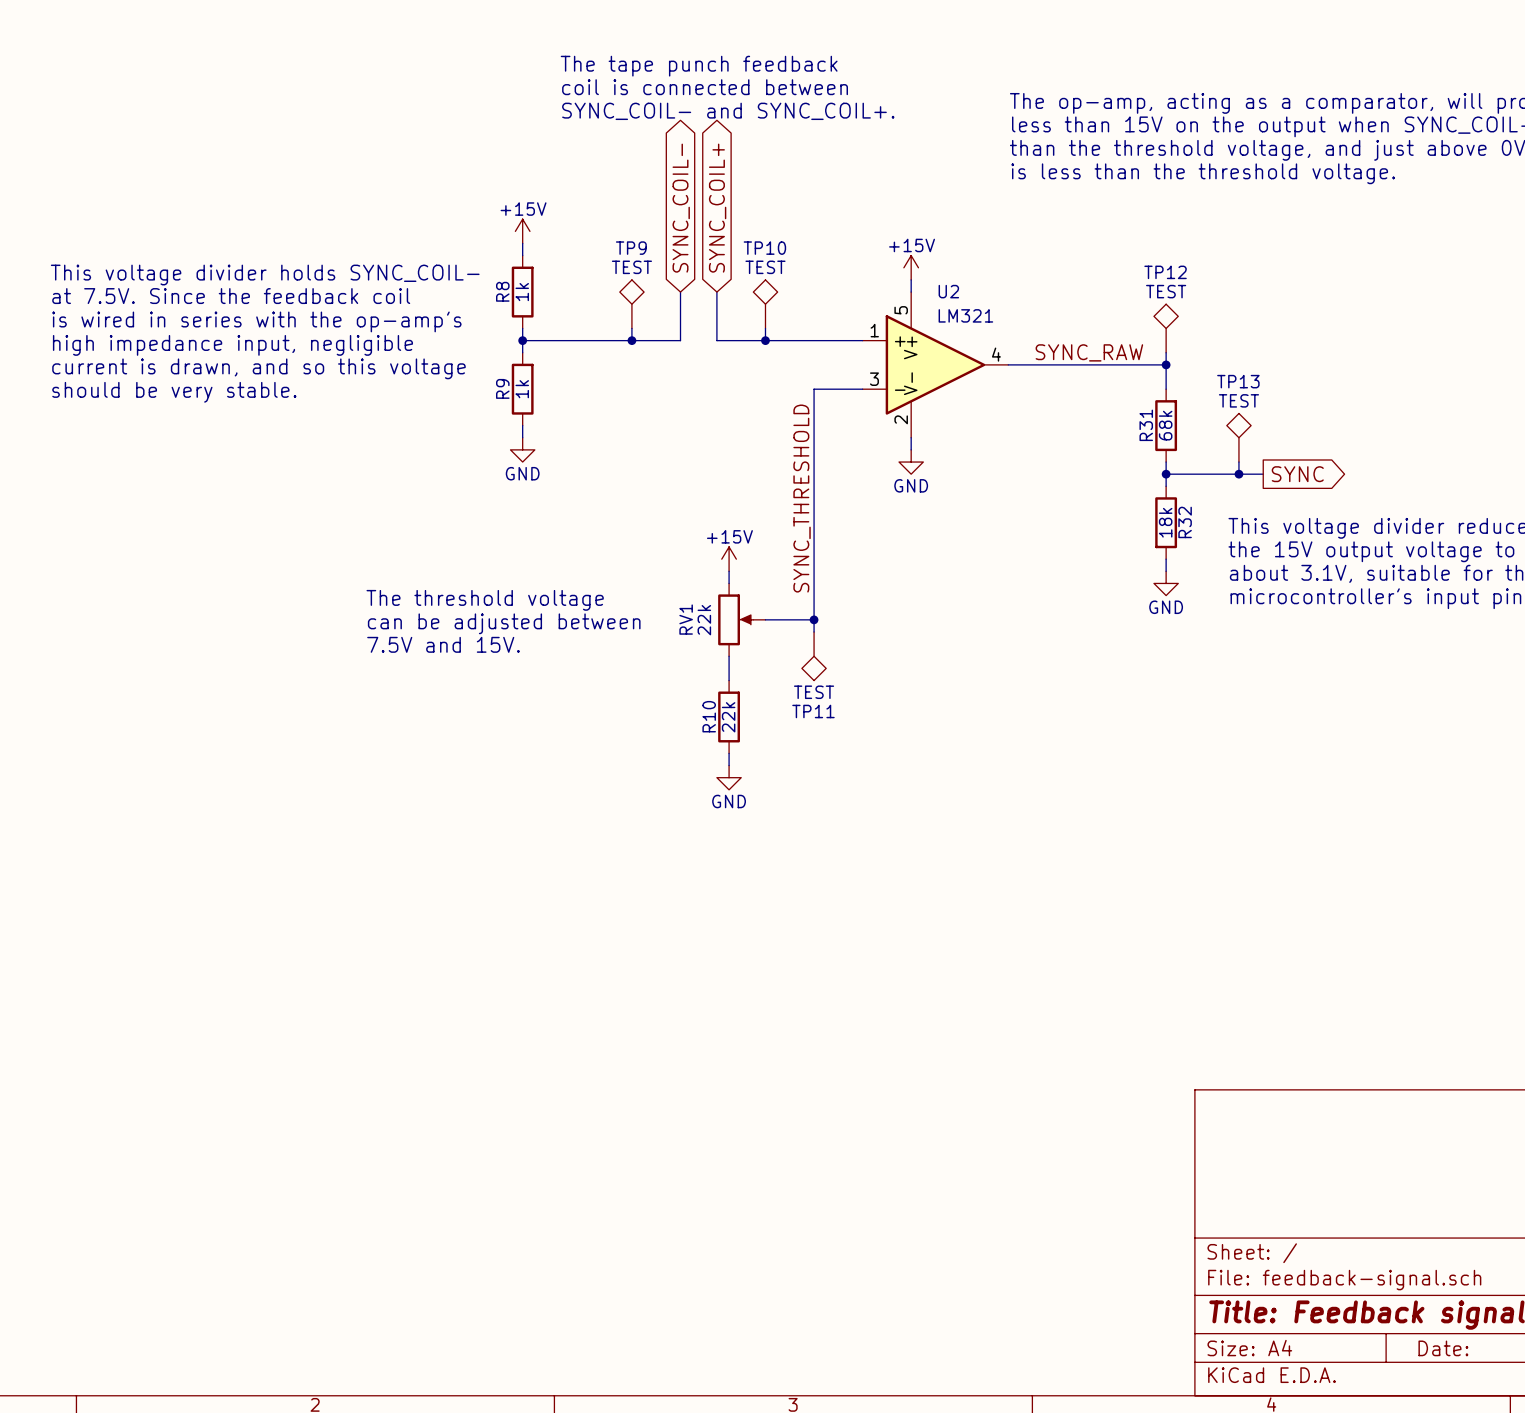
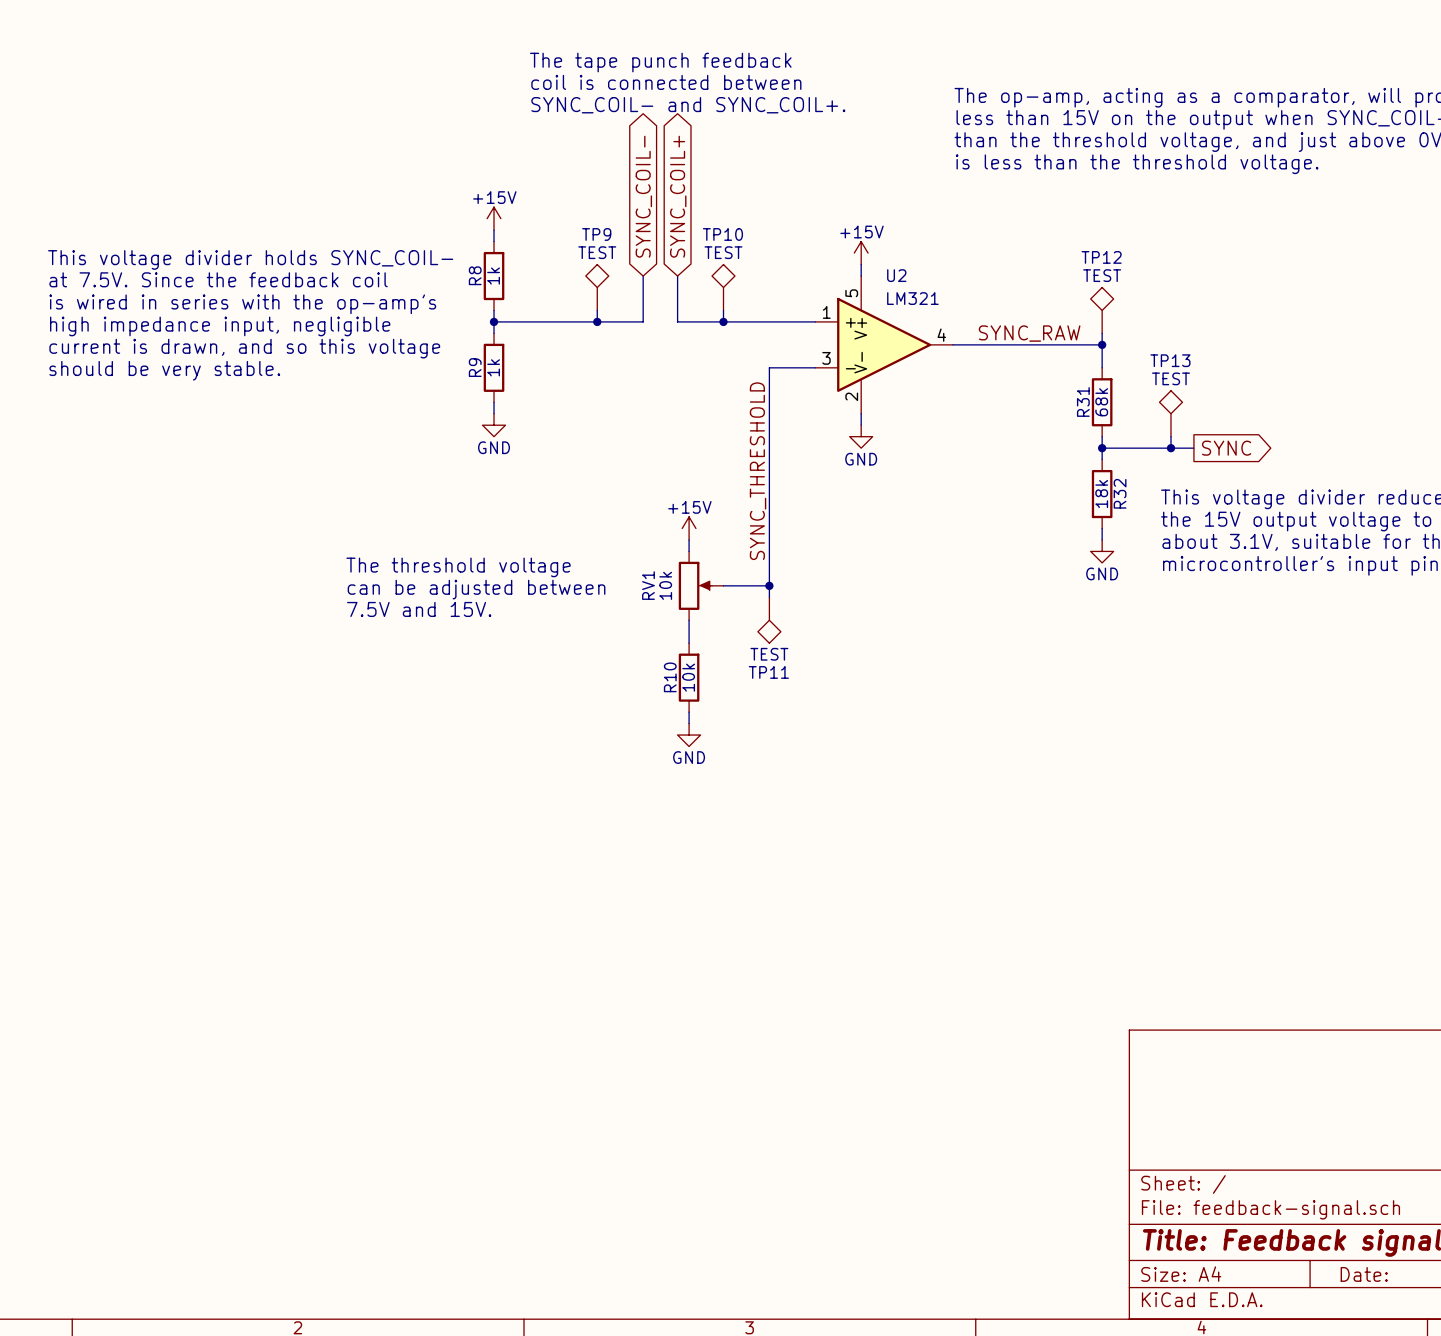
RV1 value: 22k (704, 620) -> 10k (665, 585)
R10 value: 22k (728, 717) -> 10k (688, 677)

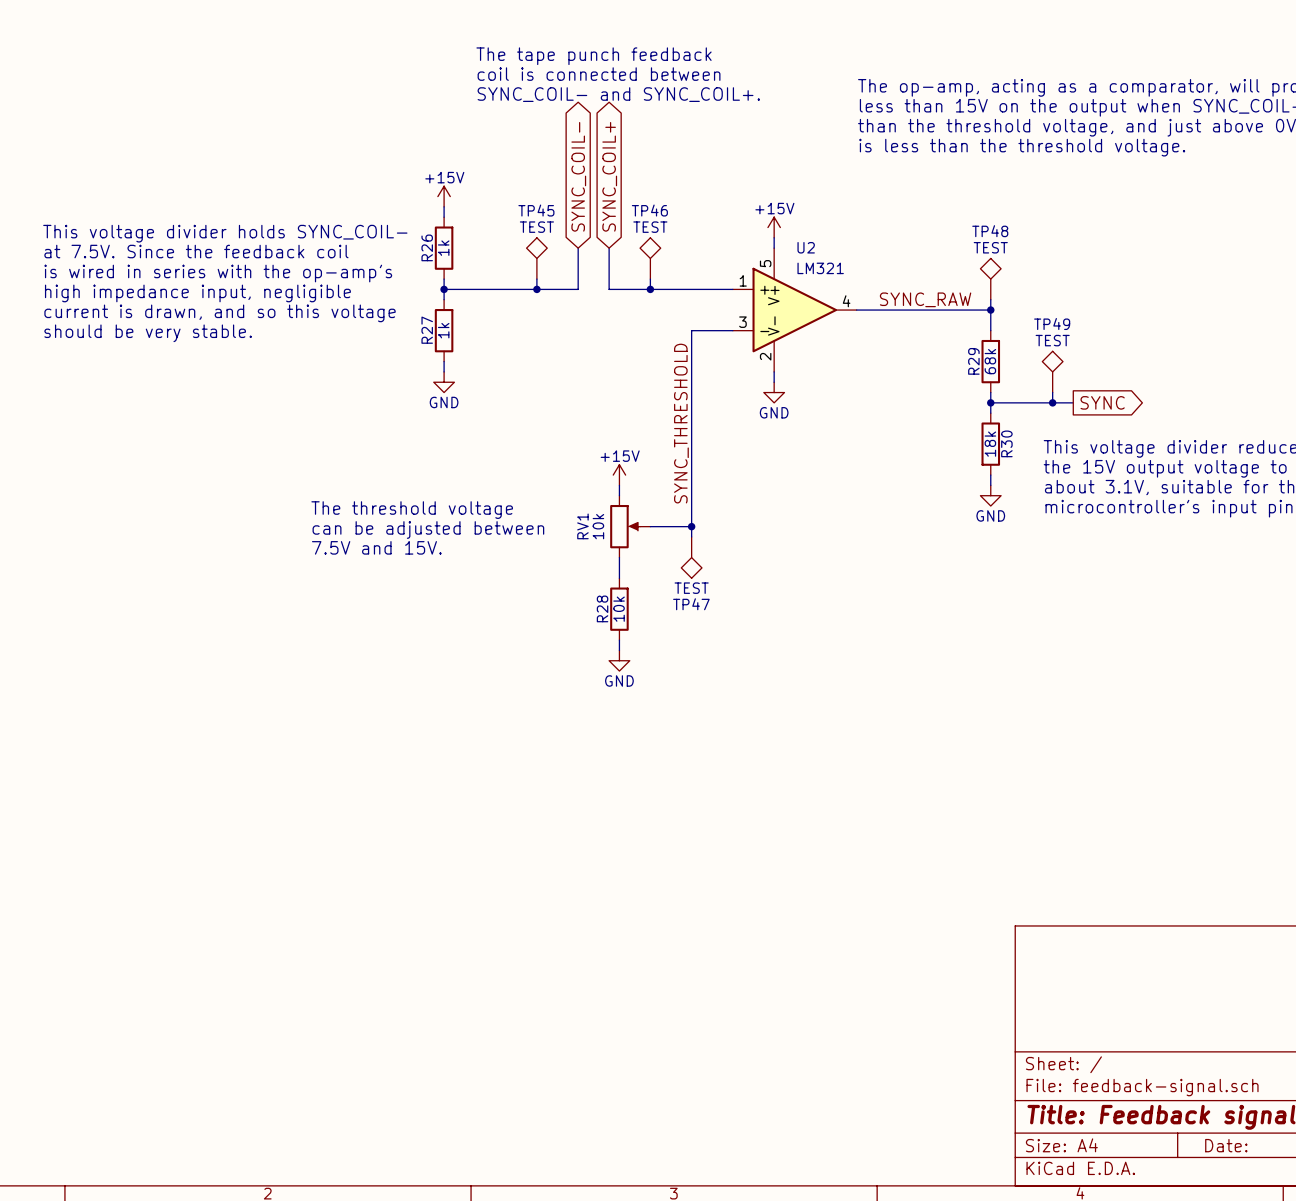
TP9 name: TP9 (596, 234) -> TP45 (536, 210)
TP10 name: TP10 (722, 234) -> TP46 (649, 210)
TP12 name: TP12 (1101, 257) -> TP48 (990, 231)
R8 name: R8 (475, 275) -> R26 (427, 247)
TP13 name: TP13 (1170, 360) -> TP49 (1052, 324)
R9 name: R9 (475, 367) -> R27 (427, 330)
R31 name: R31 (1083, 401) -> R29 (973, 361)
R32 name: R32 (1120, 493) -> R30 (1006, 443)
TP11 name: TP11 (768, 672) -> TP47 (691, 604)
R10 name: R10 (670, 677) -> R28 (602, 608)

